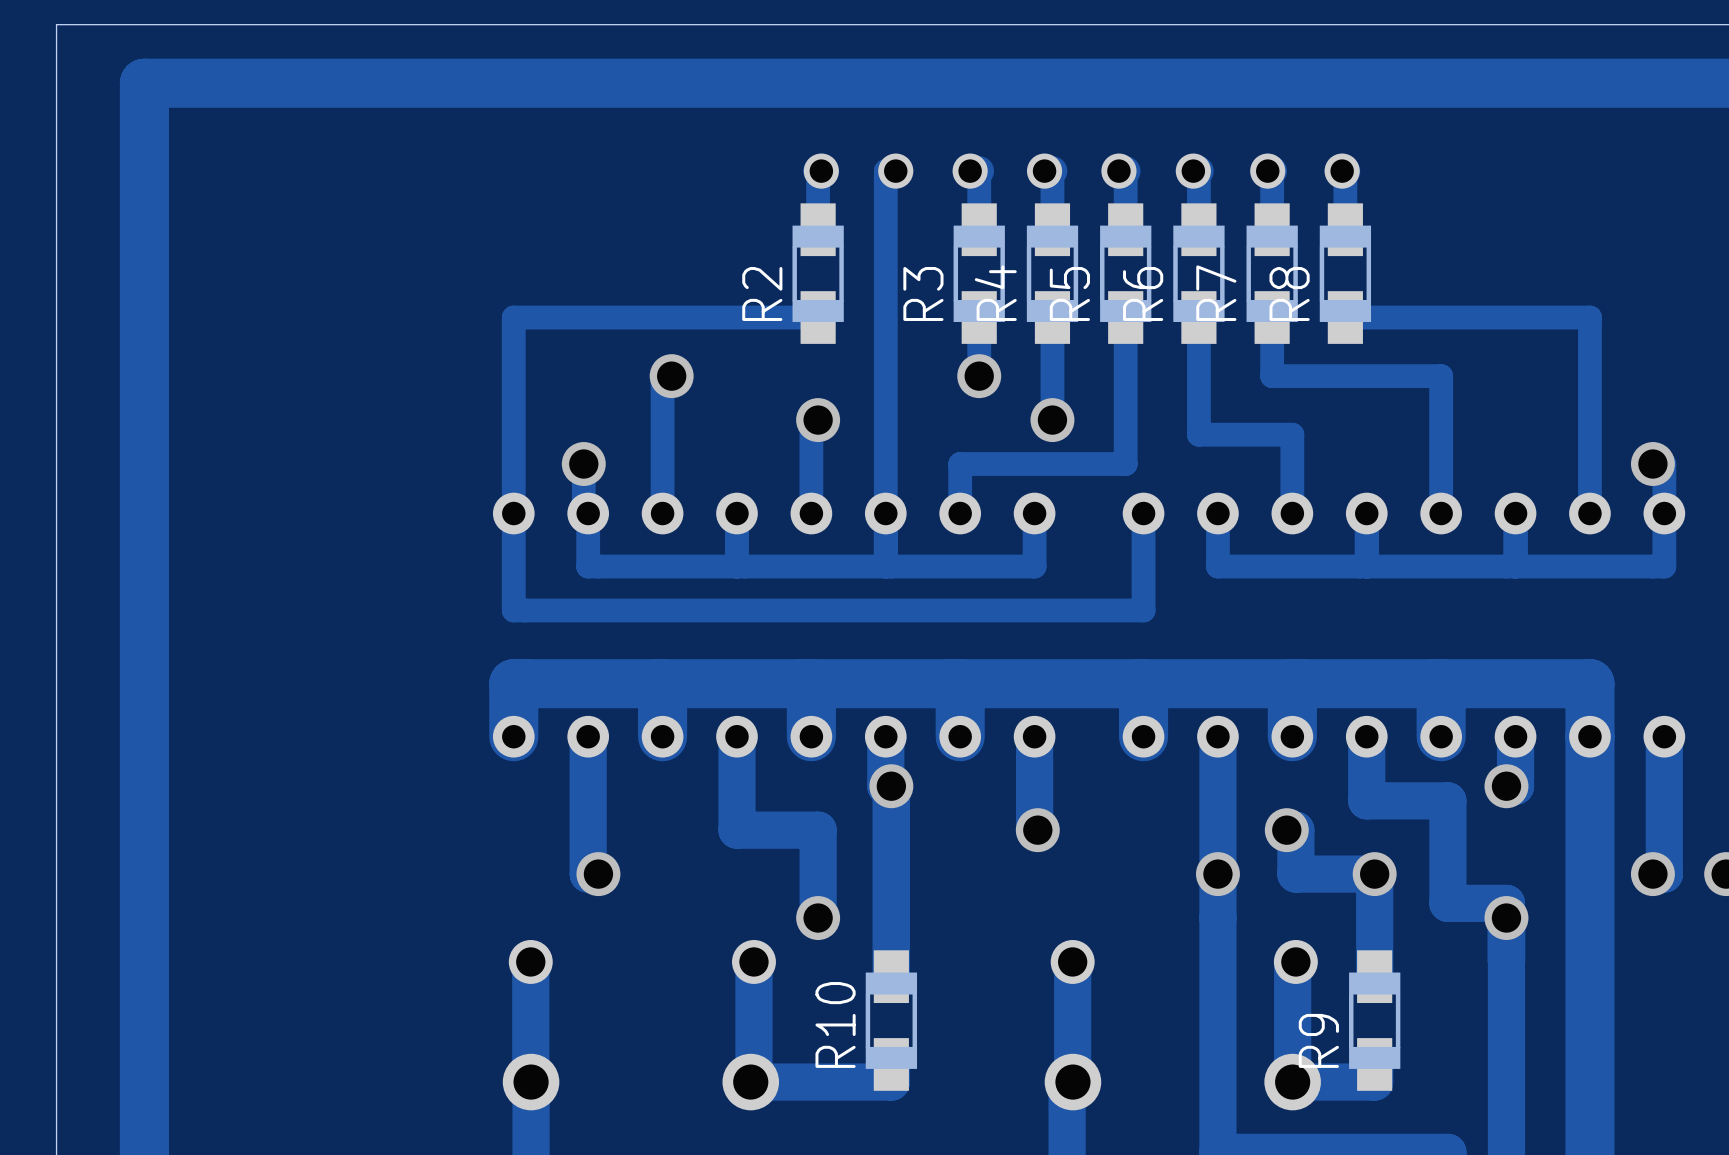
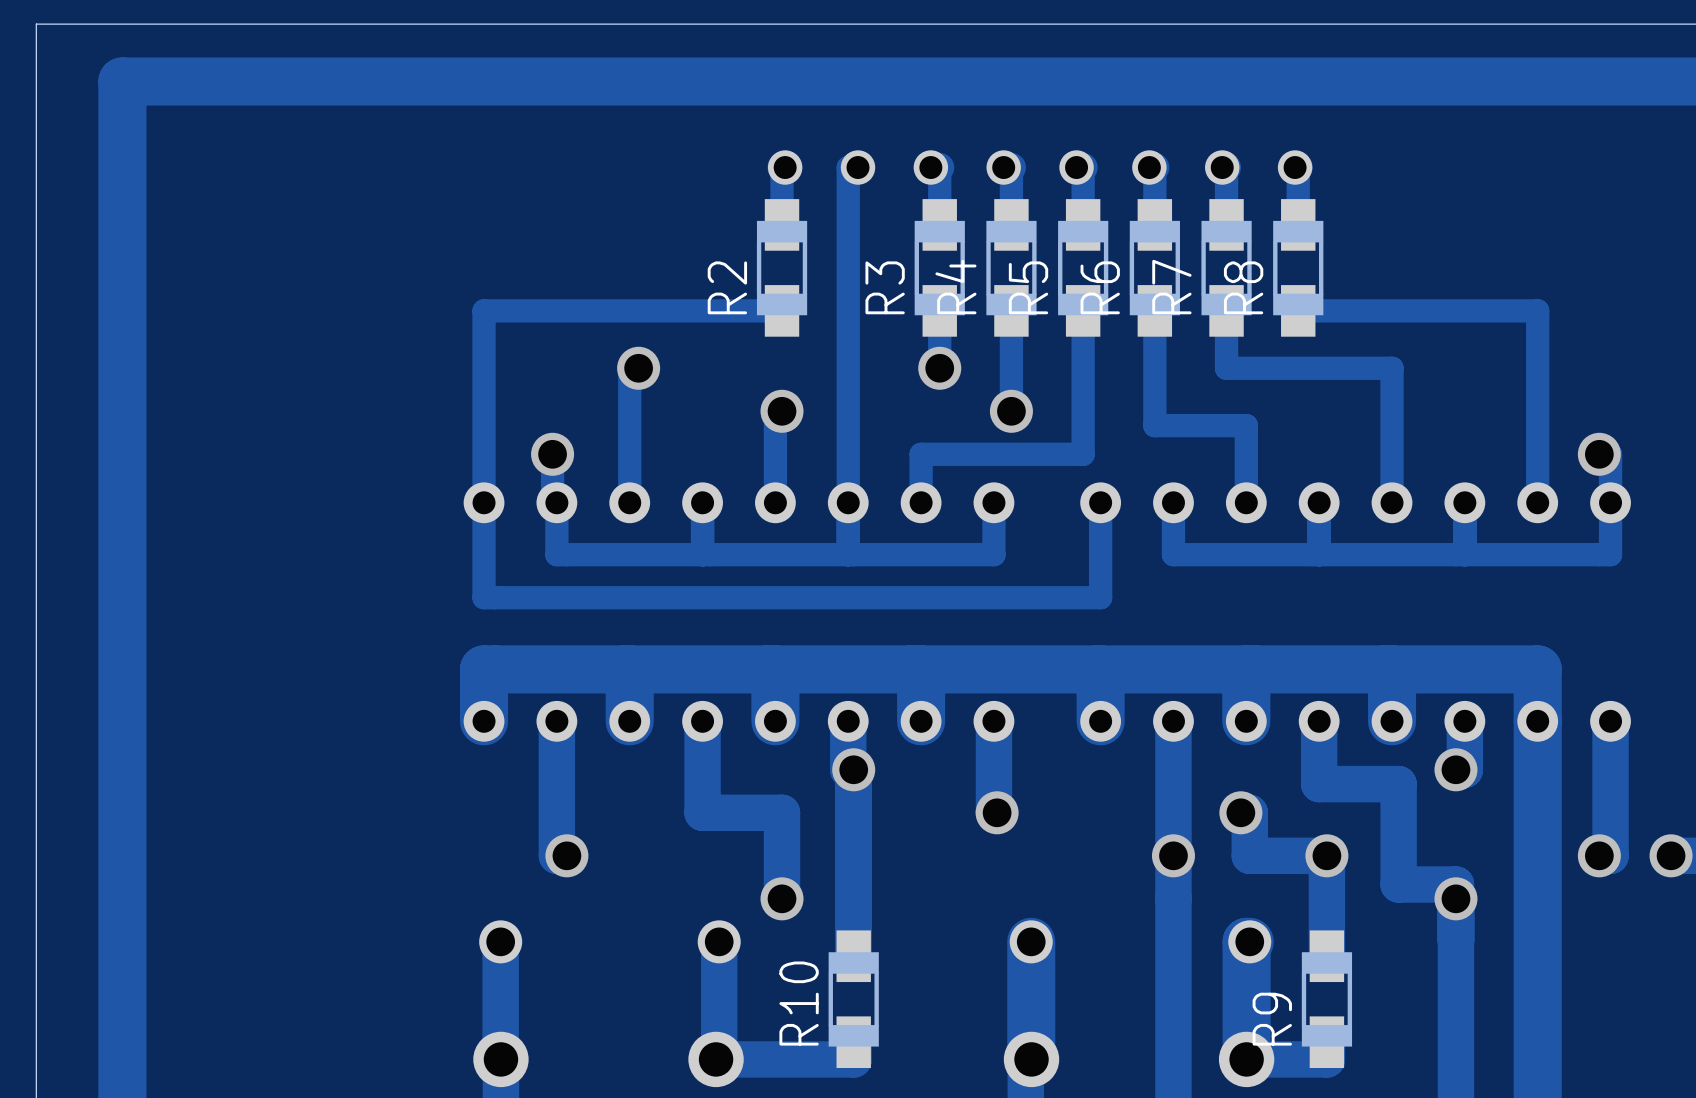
track width: thin (1072, 961) (1072, 1082) -> thick (1031, 941) (1031, 1059)
track width: thin (1295, 961) (1292, 961) (1292, 1082) -> thick (1249, 941) (1246, 941) (1246, 1059)

